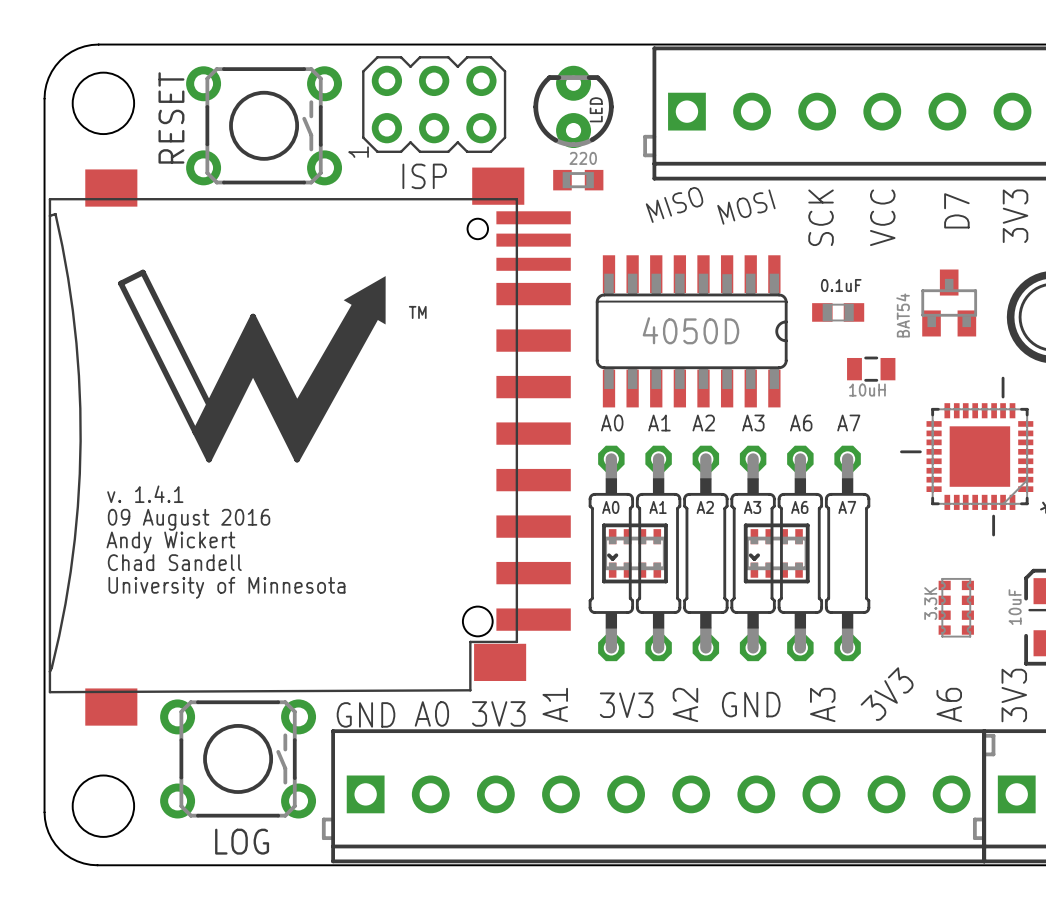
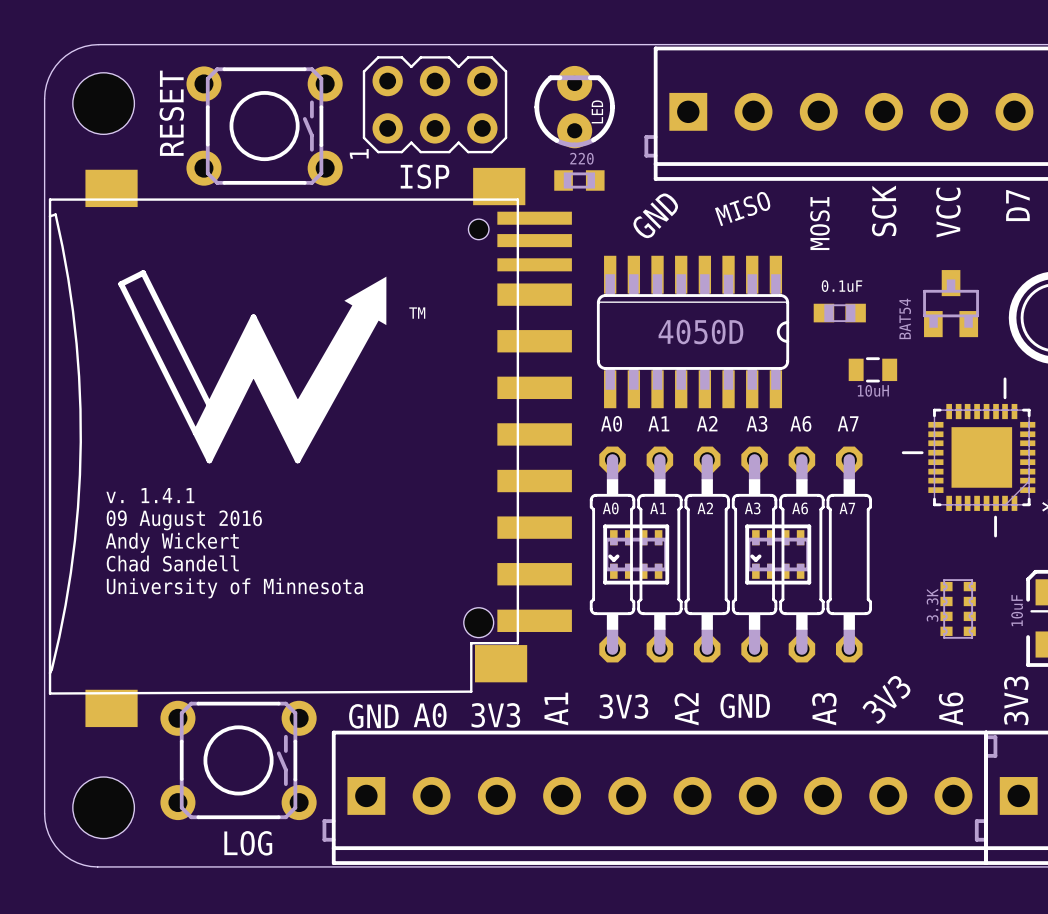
text position: MISO (674, 204) -> MISO (742, 208)
text rotation: 0° (746, 207) -> 73.2° counterclockwise (819, 223)
text: none -> GND (655, 215)
text: D7 (956, 210) -> VCC (948, 212)
text: 3V3 (1015, 216) -> D7 (1017, 205)
text: SCK (821, 217) -> none
text: VCC (882, 217) -> SCK (884, 210)

